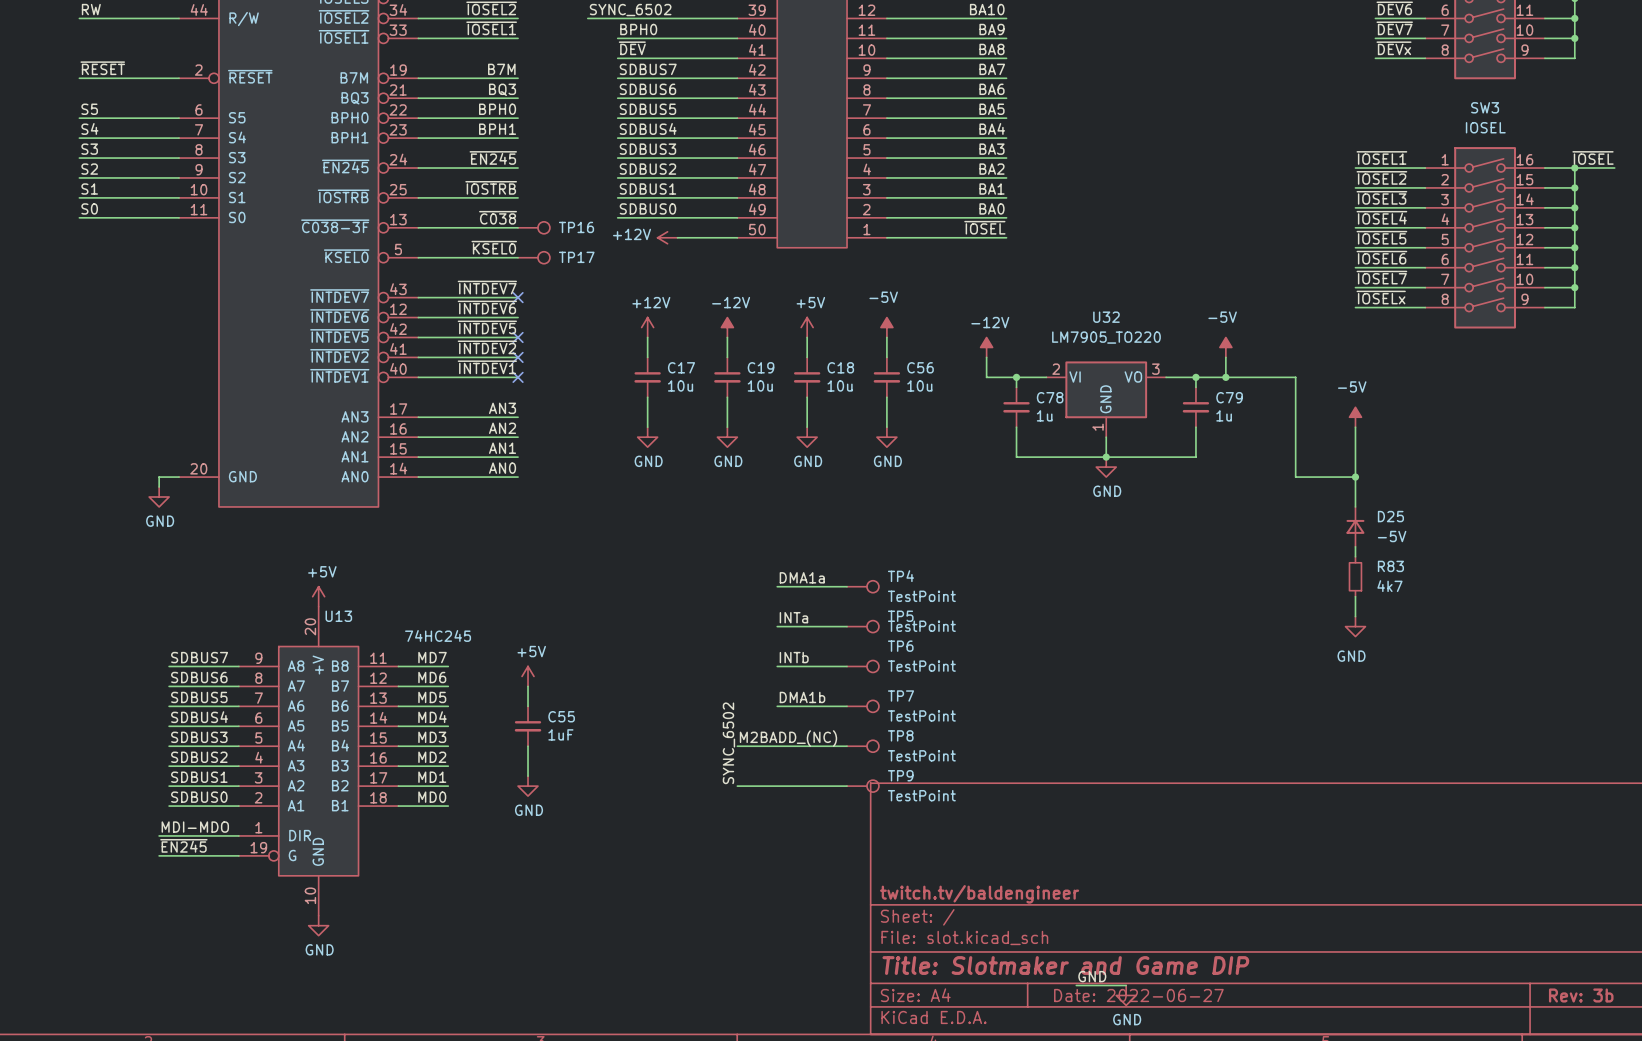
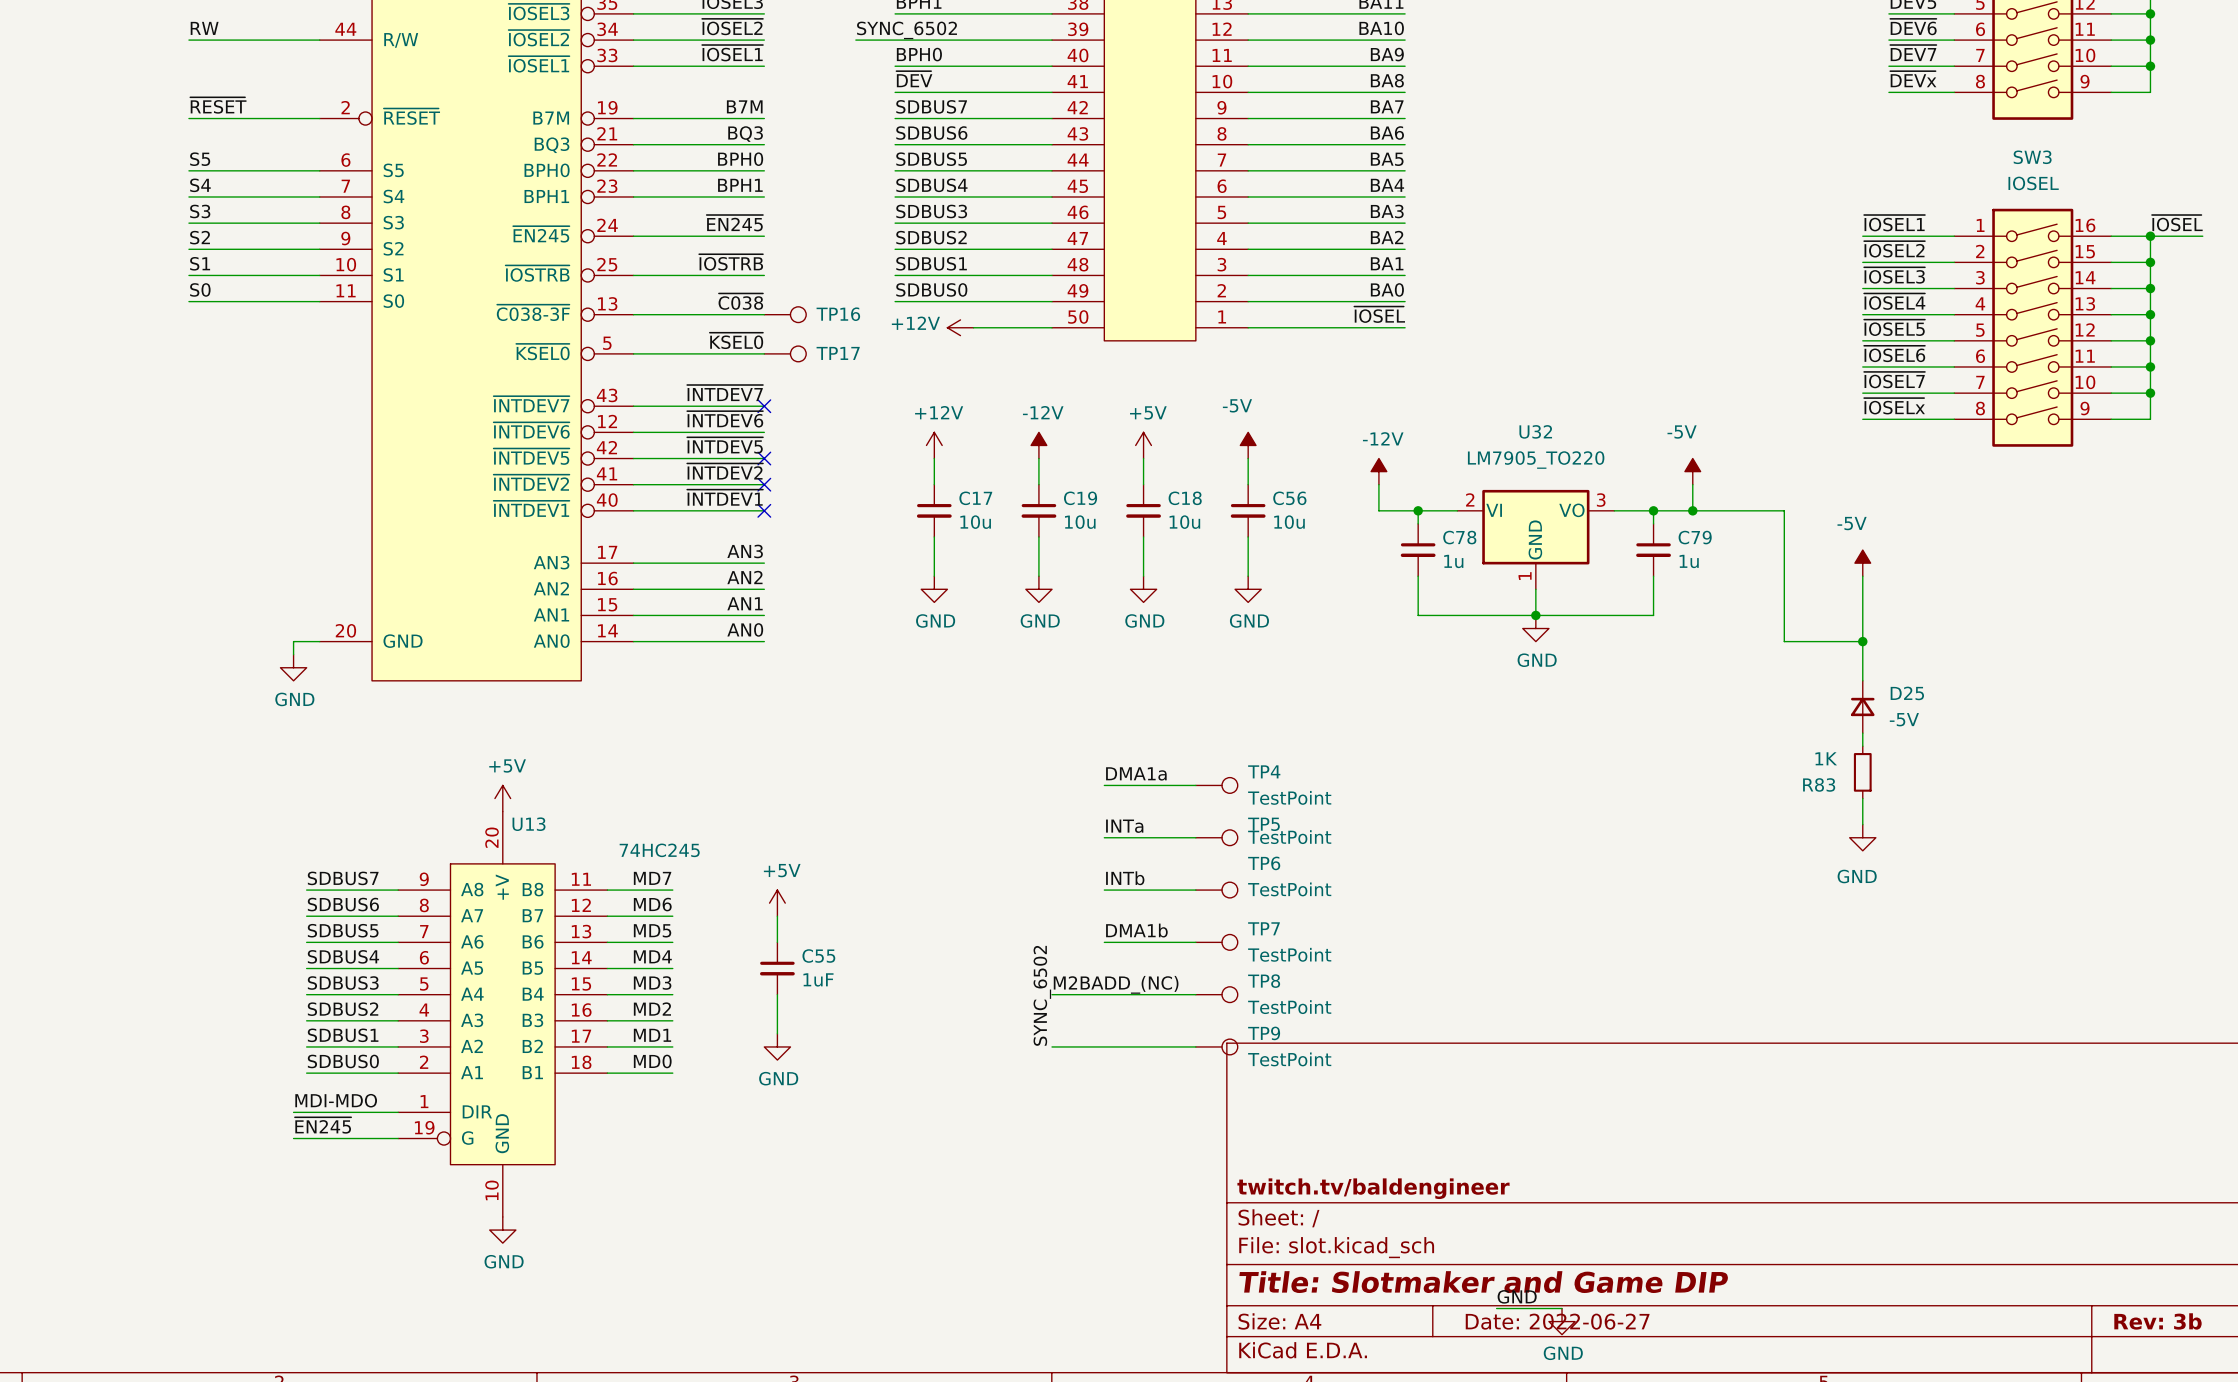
R83 name position: R83 (1390, 566) -> R83 (1819, 784)
R83 value: 4k7 (1389, 586) -> 1K (1826, 758)

